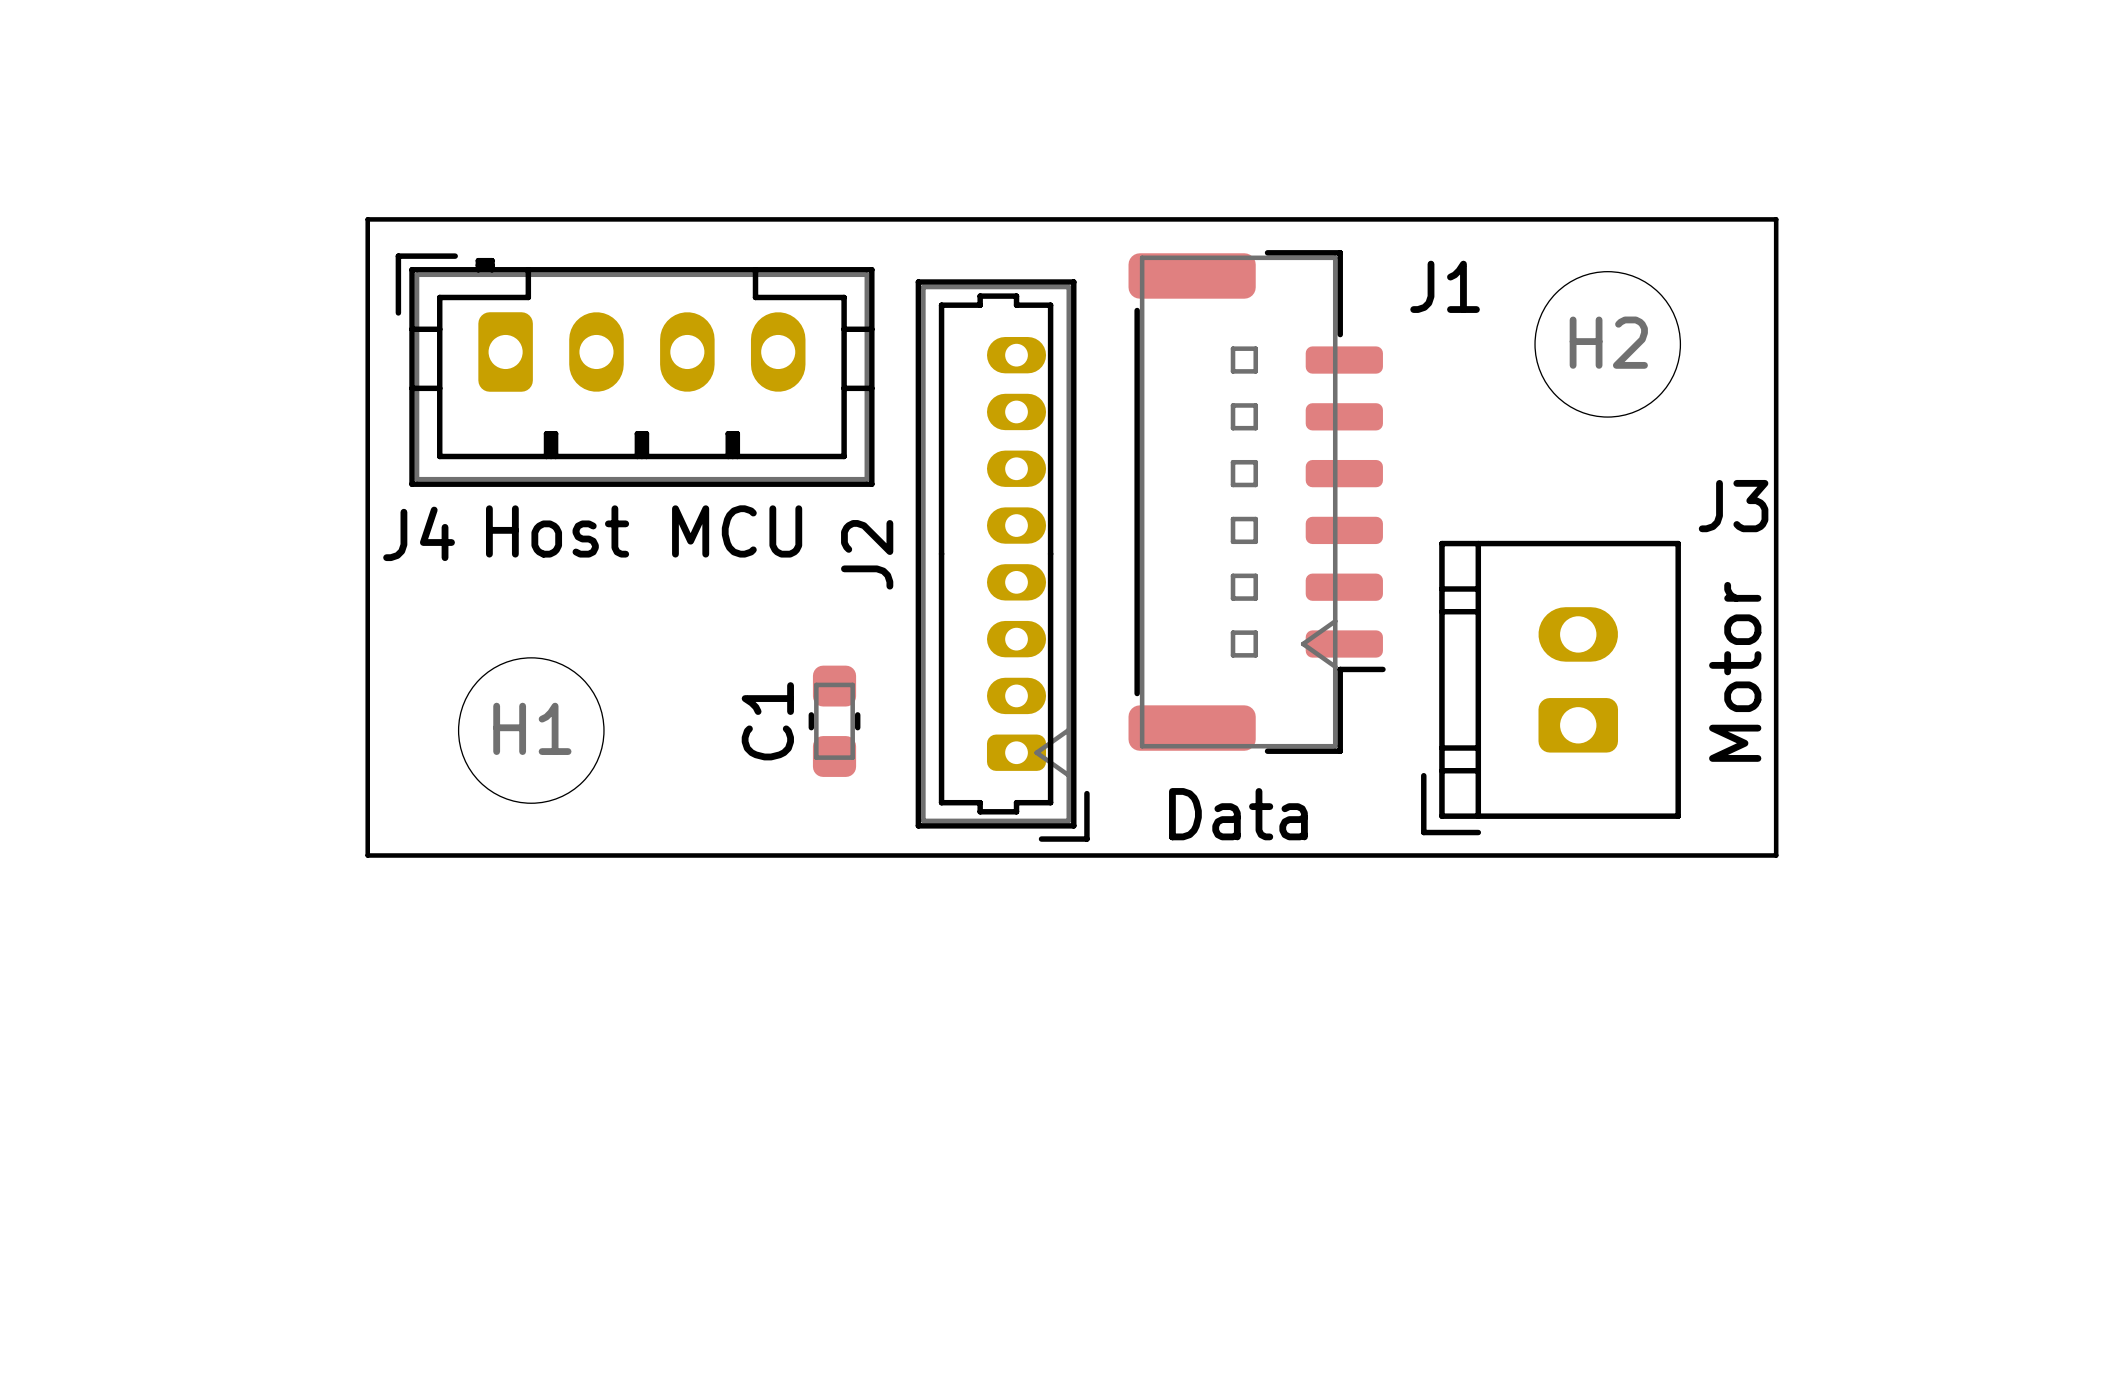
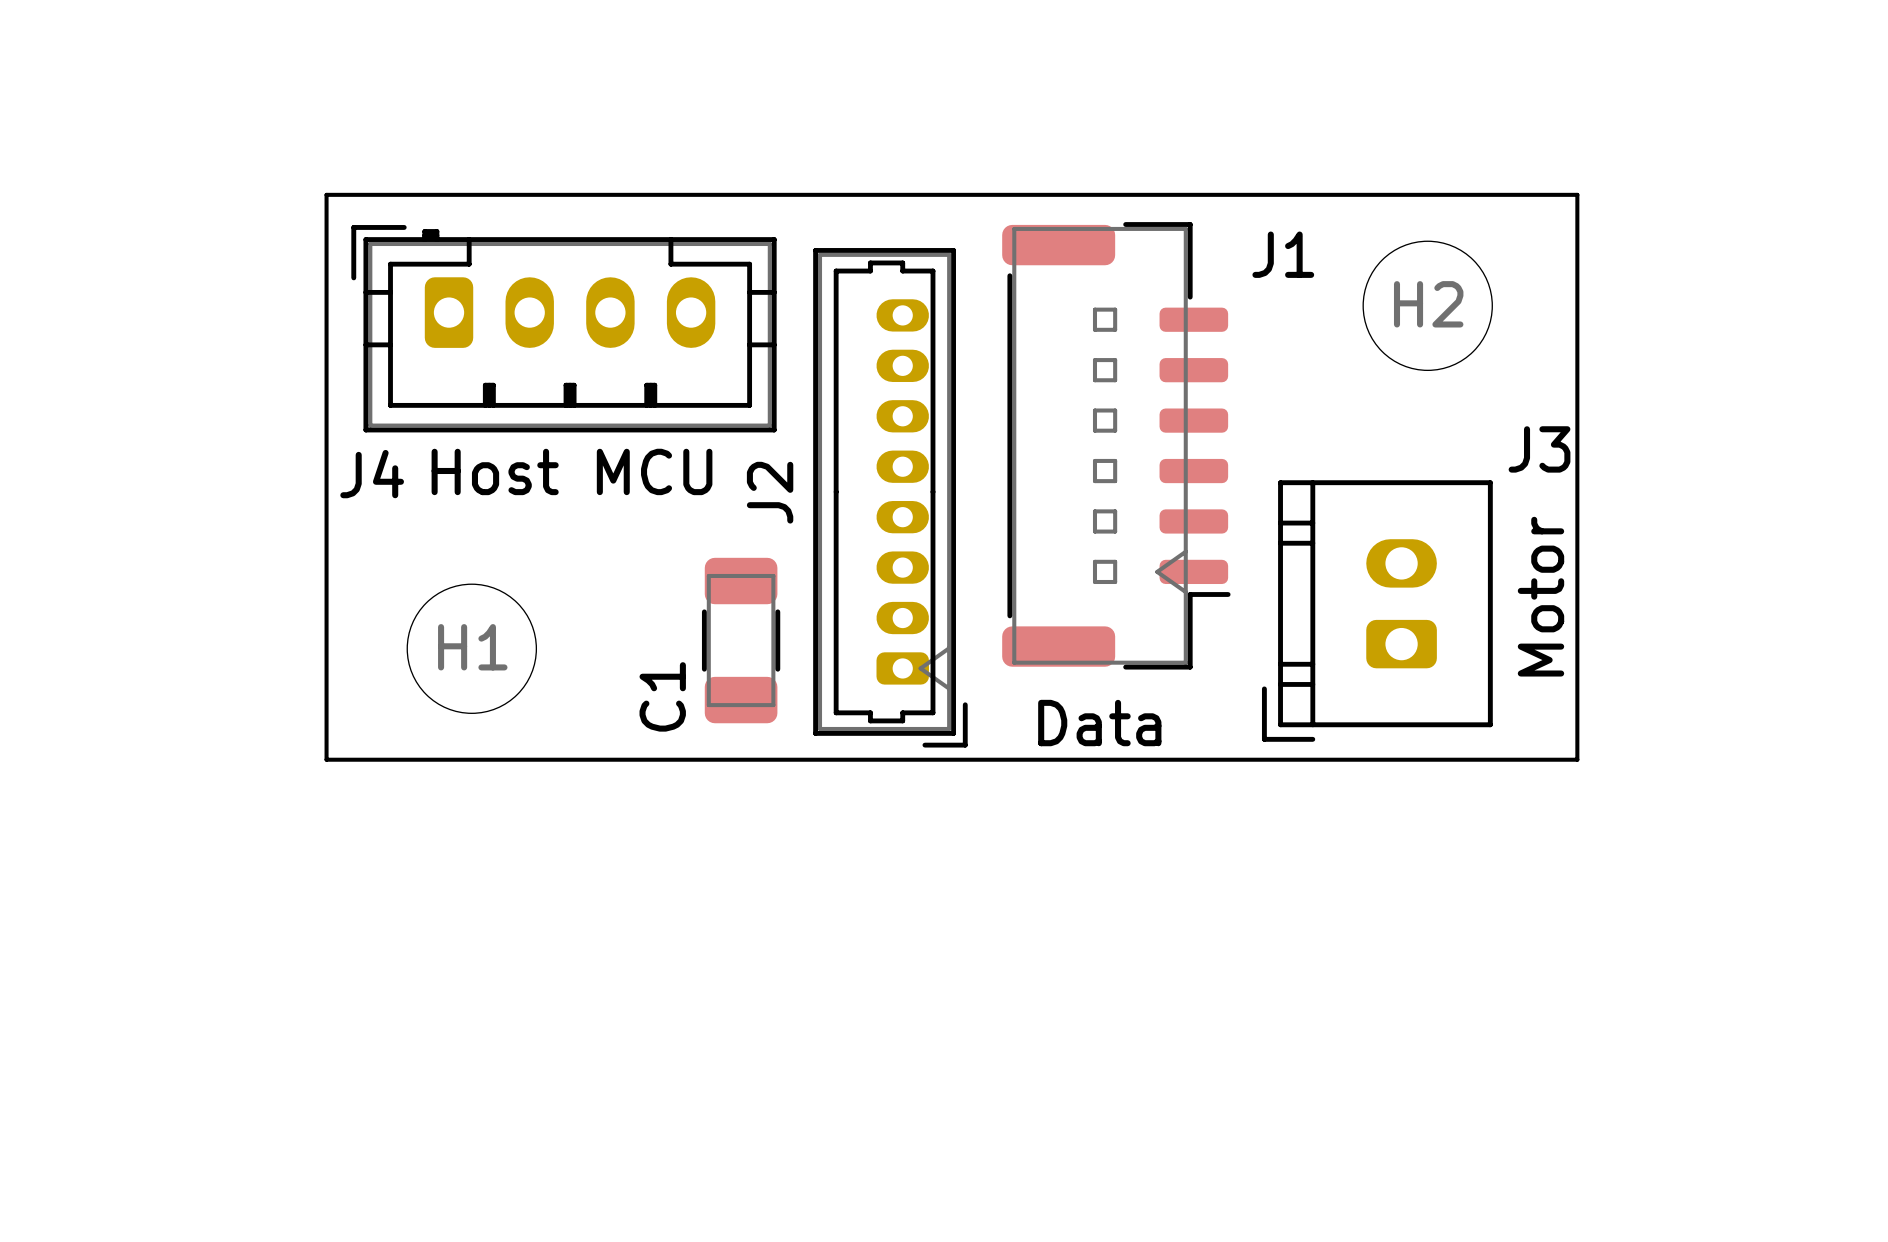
C1 footprint: [808, 665, 861, 777] -> [701, 557, 781, 724]
C1 name position: C1 (767, 721) -> C1 (662, 696)

